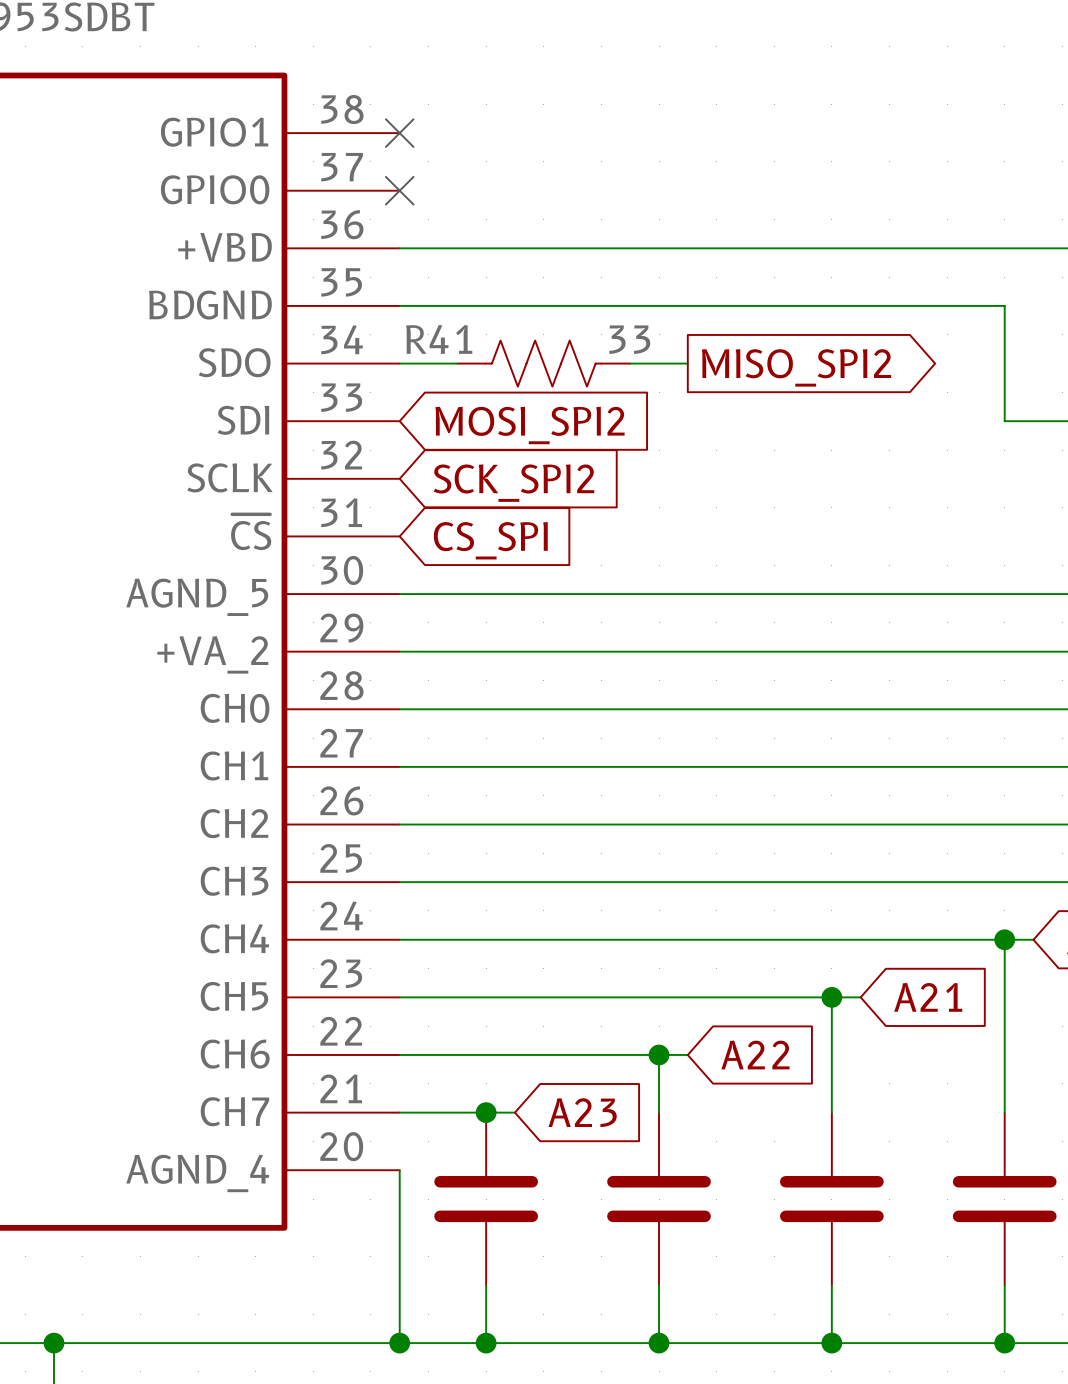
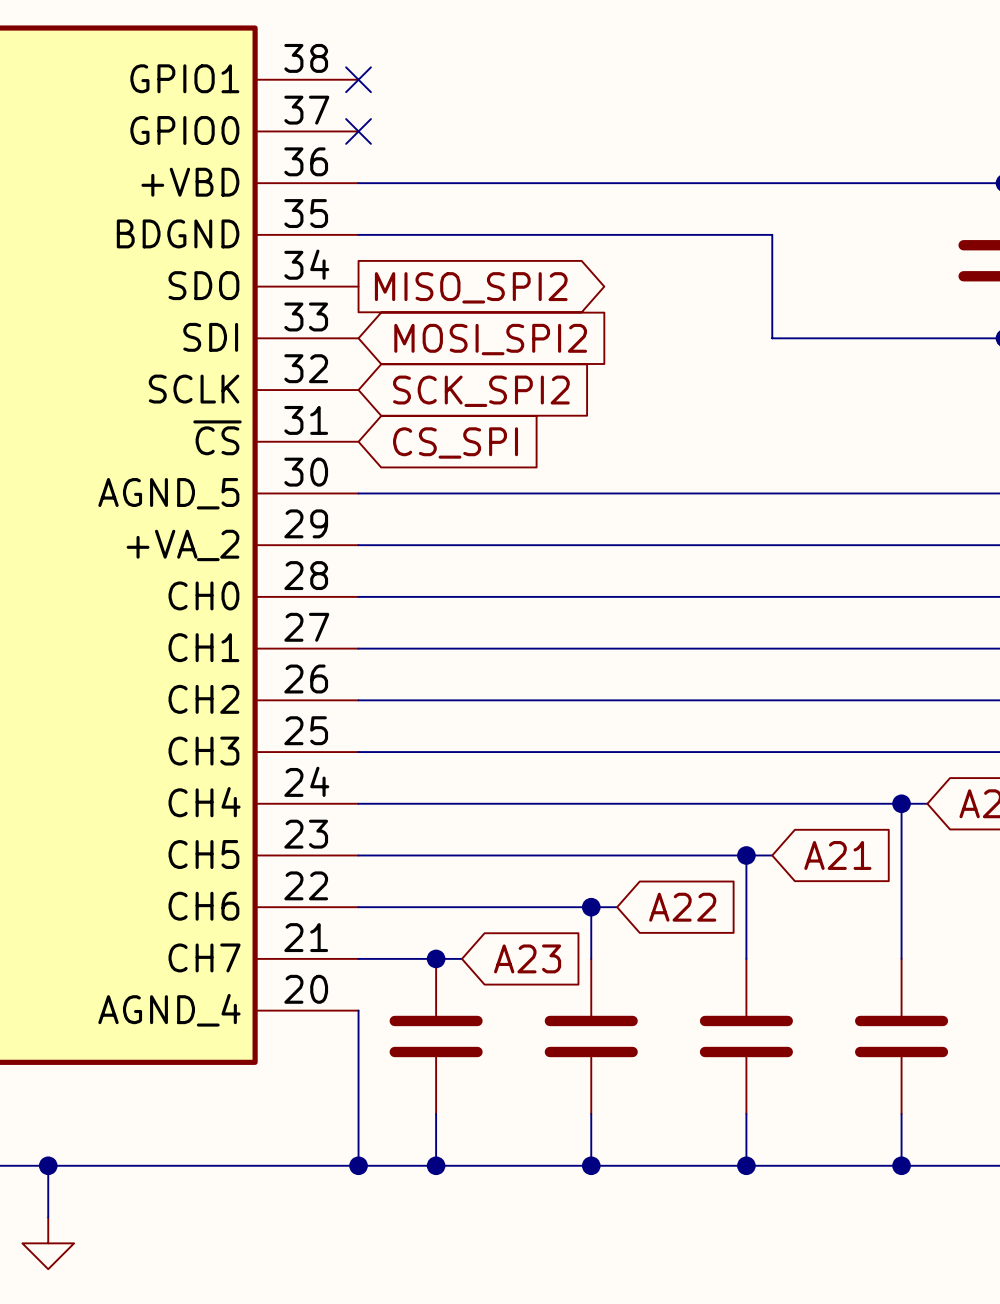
wire: (860, 305) (1004, 305) (1004, 421) -> (772, 234) (772, 338) (901, 338)
wire: (399, 363) (457, 363) -> none
R41: 33 (543, 363) -> none
wire: (630, 363) (687, 363) -> none
global label position: MISO_SPI2 (796, 367) -> MISO_SPI2 (471, 287)

